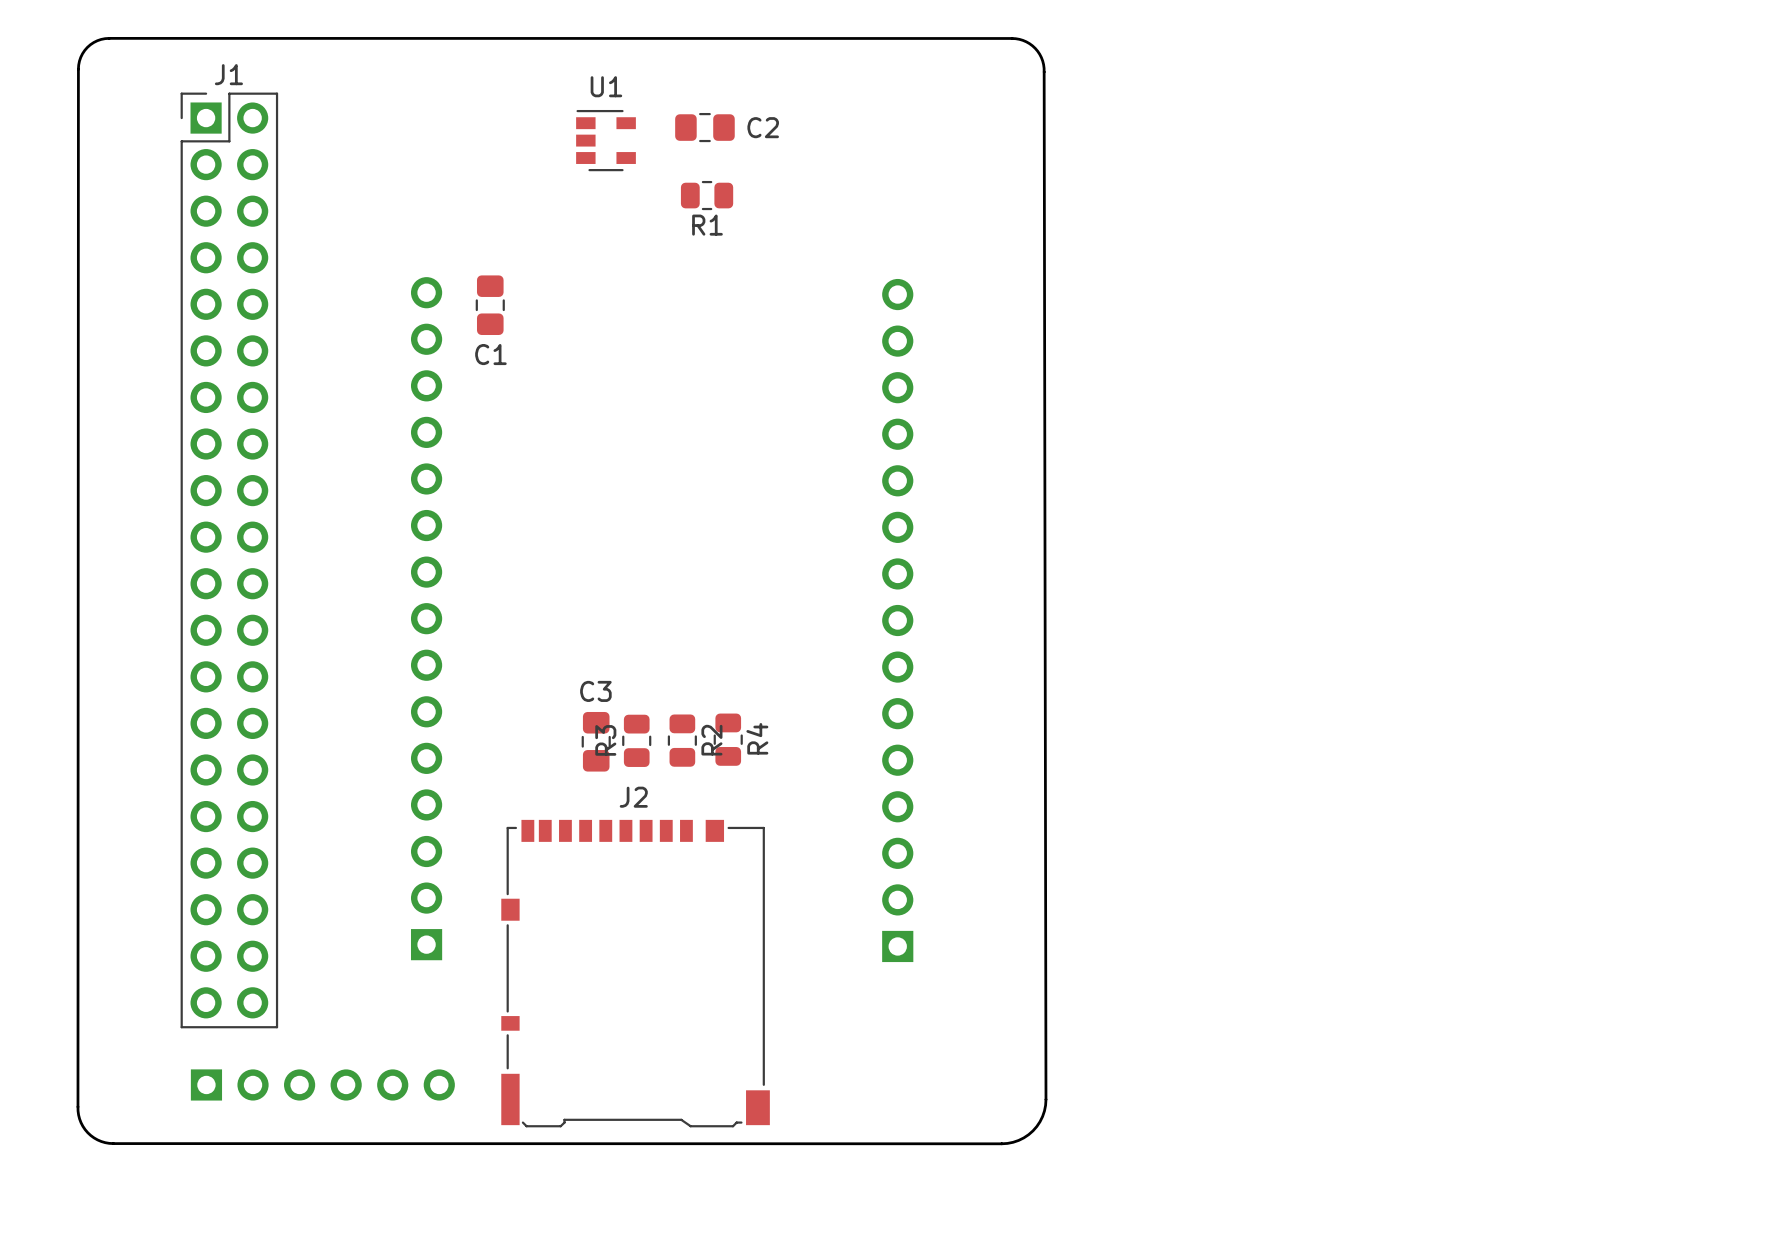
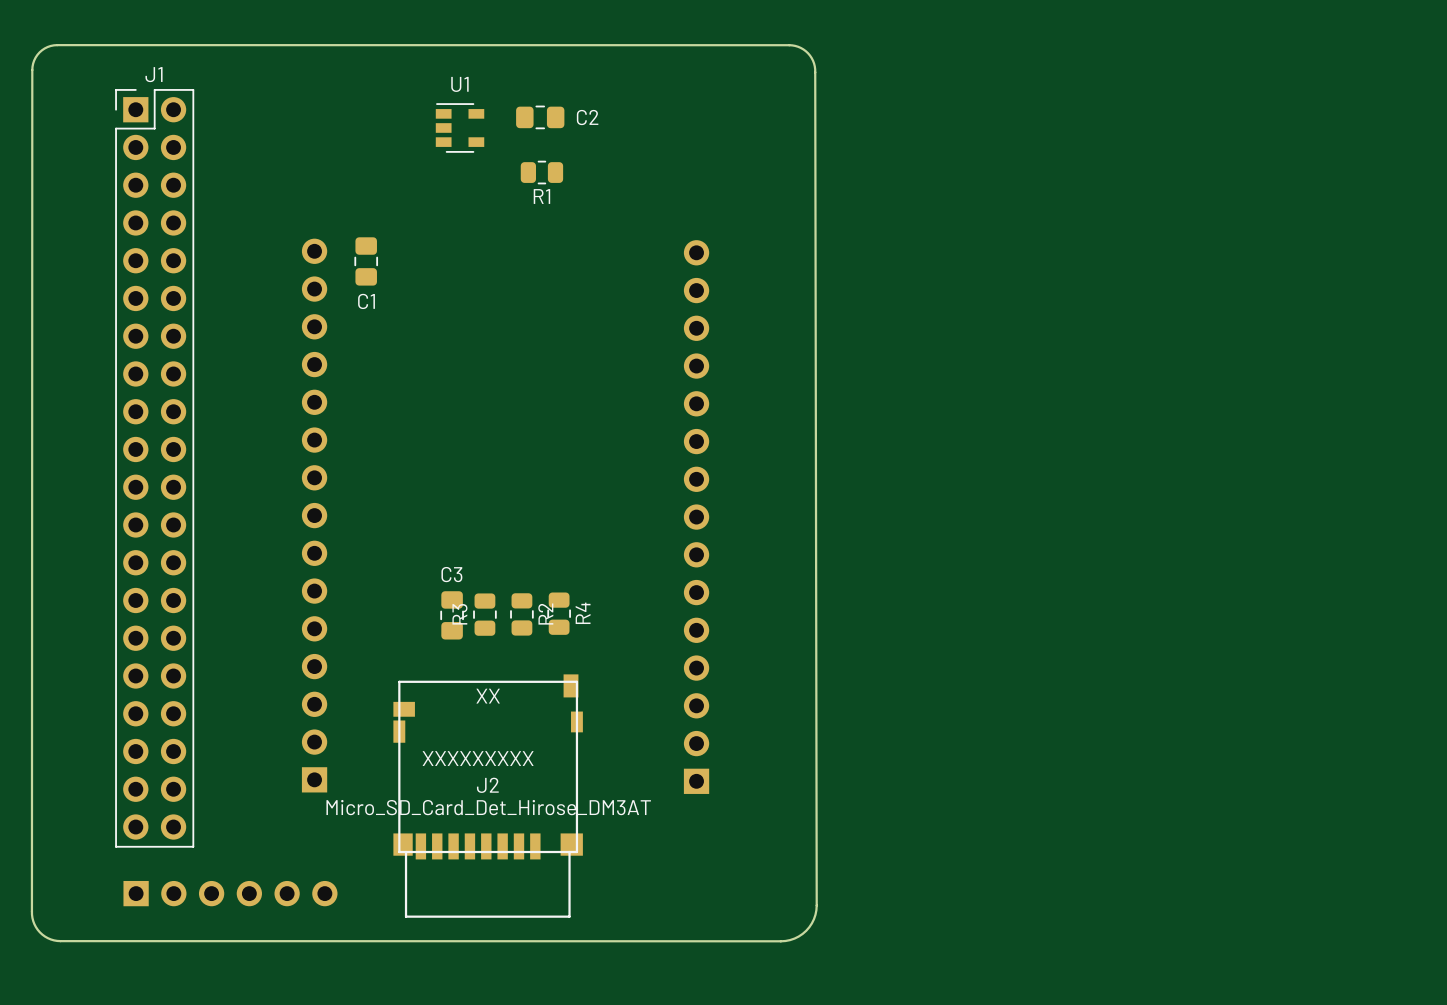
J2 name position: J2 (633, 797) -> J2 (487, 785)
J2 footprint: [501, 819, 770, 1128] -> [393, 674, 583, 918]
J2 value: none -> Micro_SD_Card_Det_Hirose_DM3AT (488, 807)

